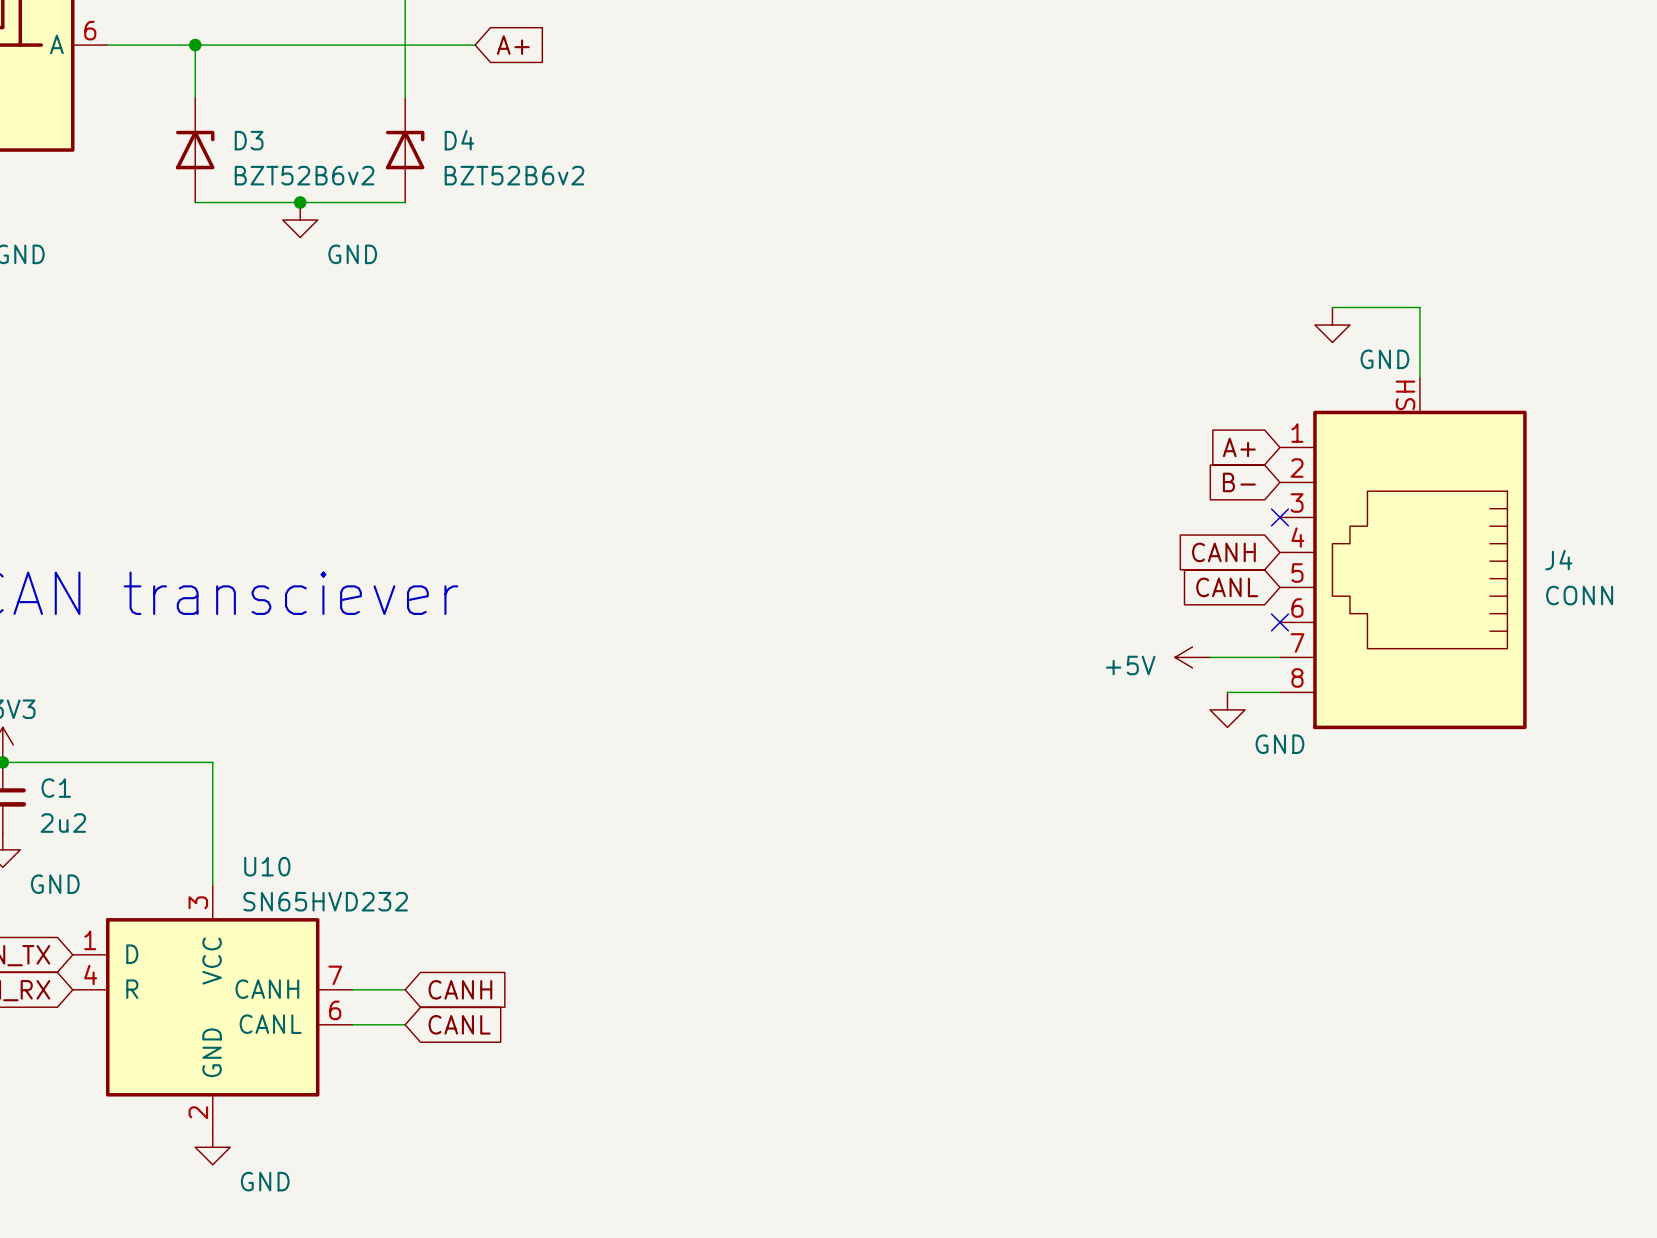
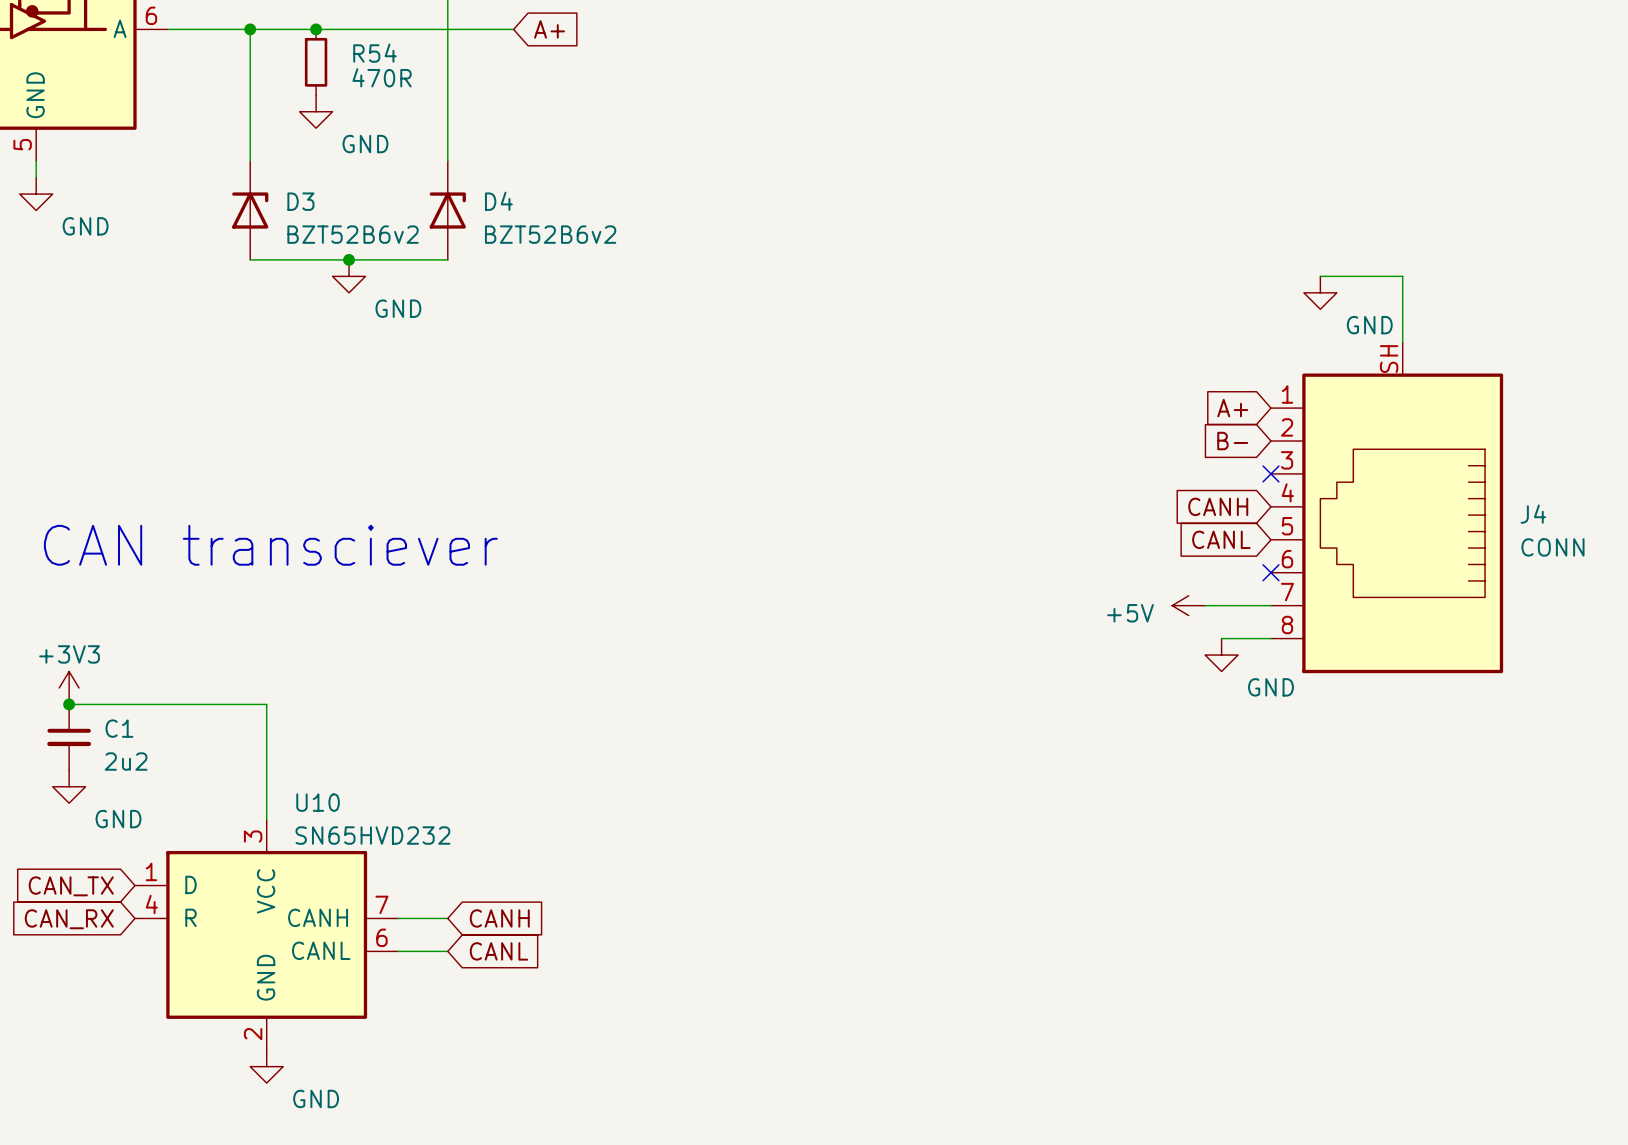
junction: none -> (316, 29)
R54: none -> 470R (316, 62)
power symbol: none -> GND (316, 111)
D3 position: (195, 150) -> (250, 210)
D4 position: (405, 150) -> (447, 210)
wire: (195, 202) (405, 202) -> (250, 259) (447, 259)
junction: (300, 202) -> none
power symbol: GND (300, 220) -> none
junction: none -> (349, 259)
power symbol: none -> GND (349, 276)

